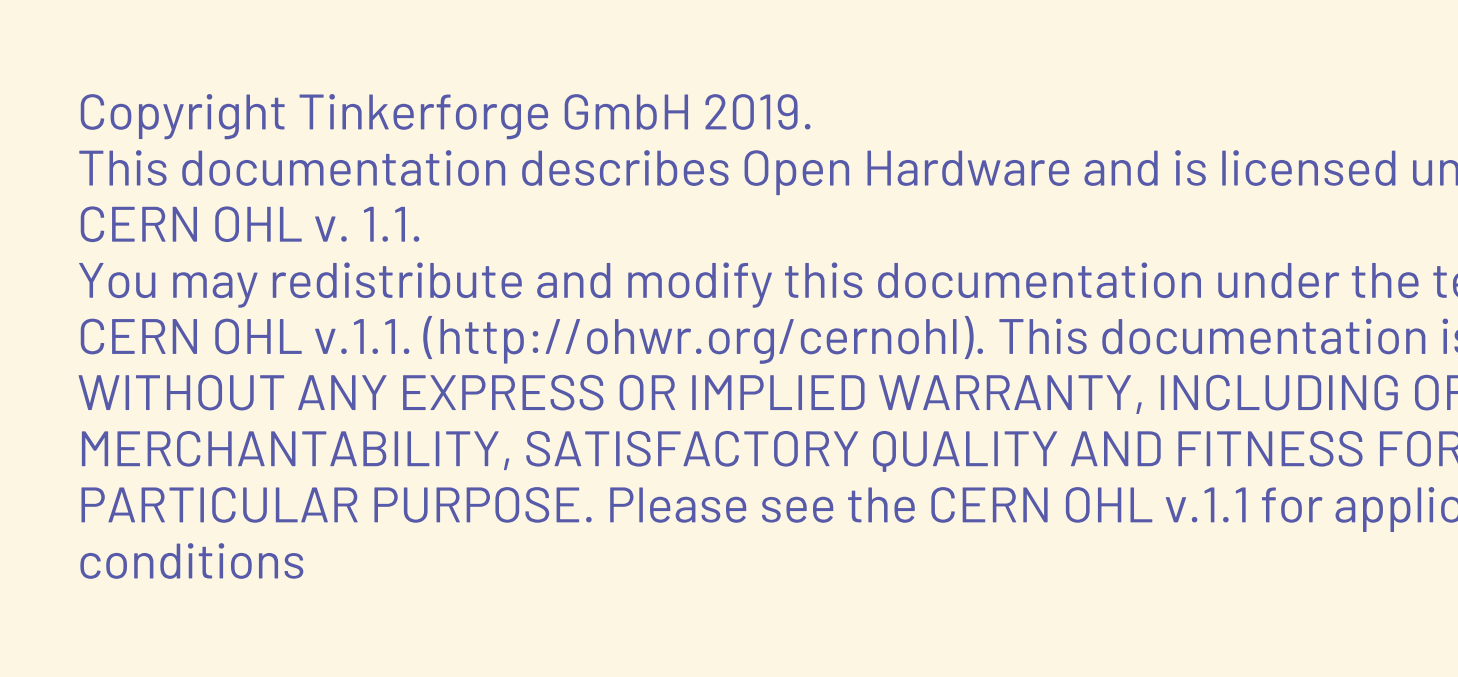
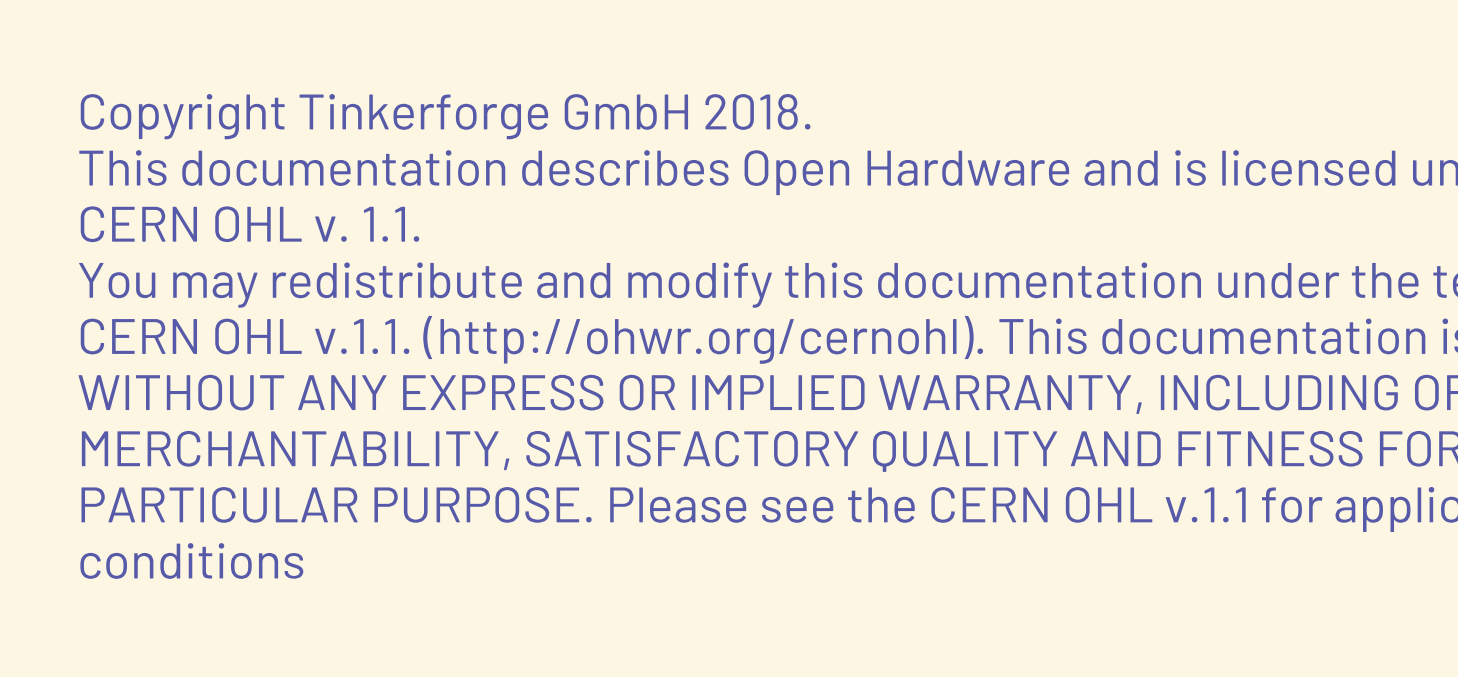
text: Copyright Tinkerforge GmbH 2019. (445, 116) -> Copyright Tinkerforge GmbH 2018. (445, 116)

